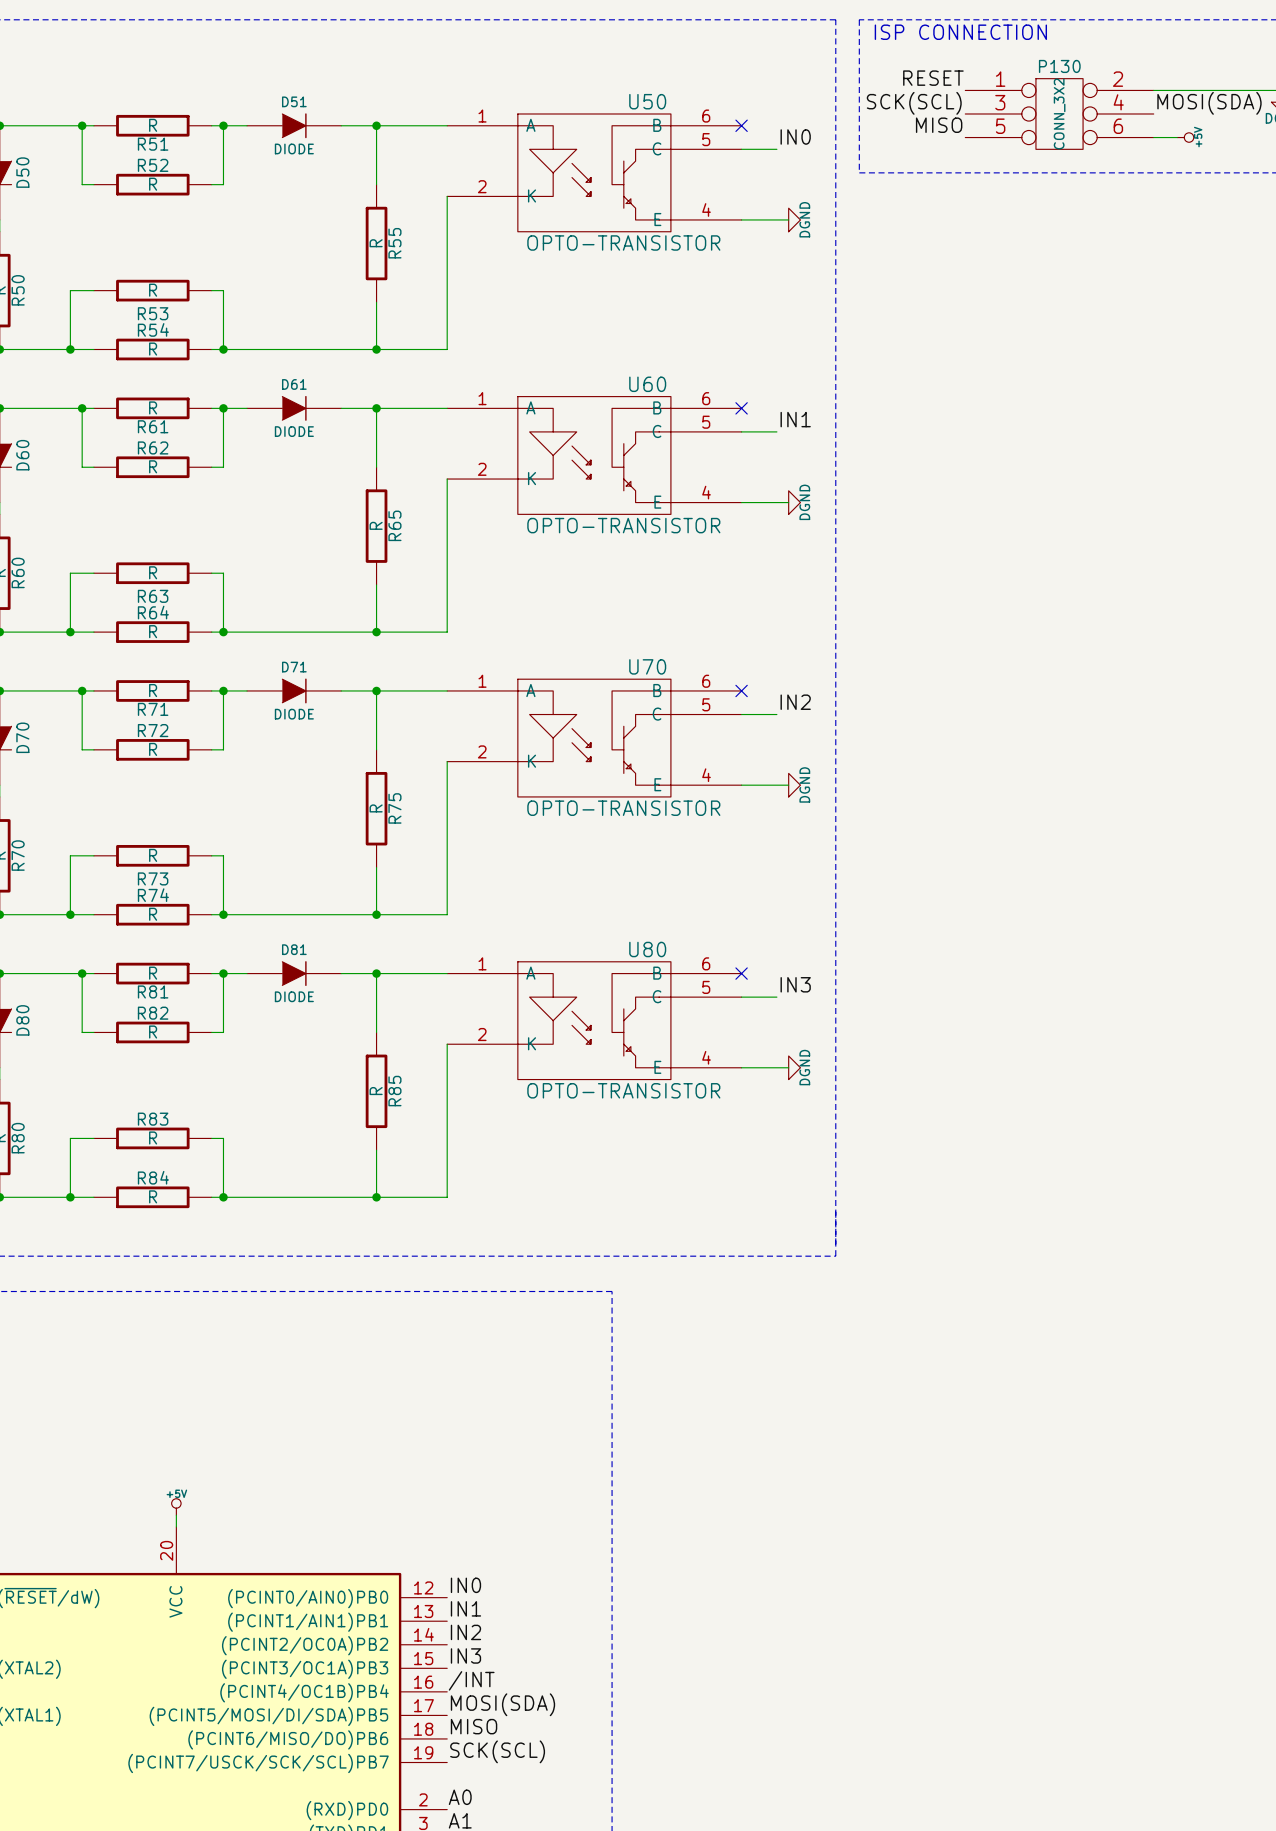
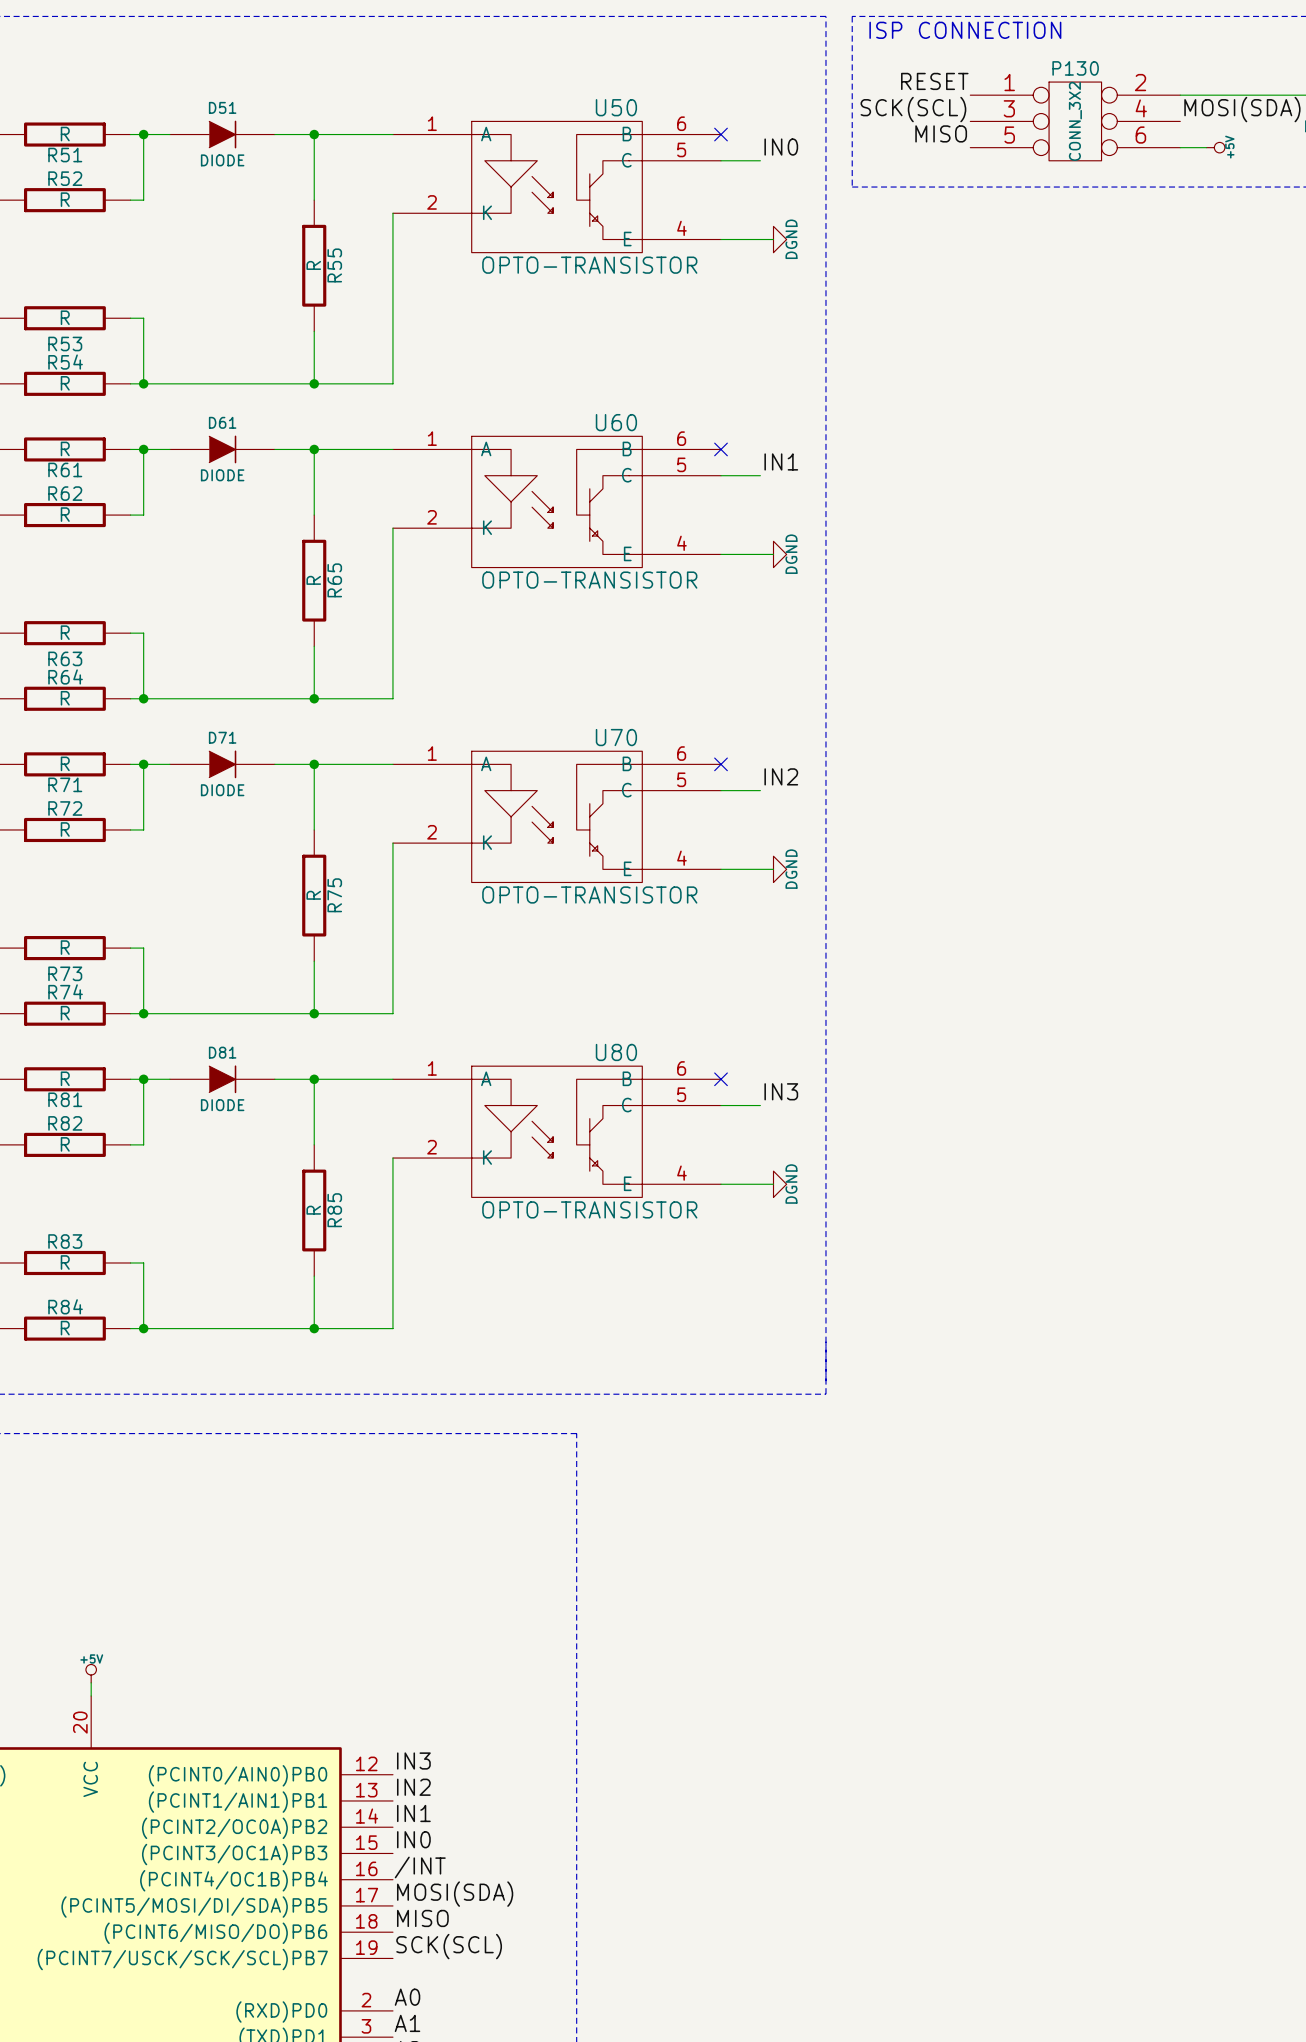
label: IN0 (465, 1585) -> IN3 (413, 1761)
label: IN1 (465, 1608) -> IN2 (413, 1787)
label: IN2 (465, 1632) -> IN1 (413, 1813)
label: IN3 (465, 1655) -> IN0 (413, 1839)

